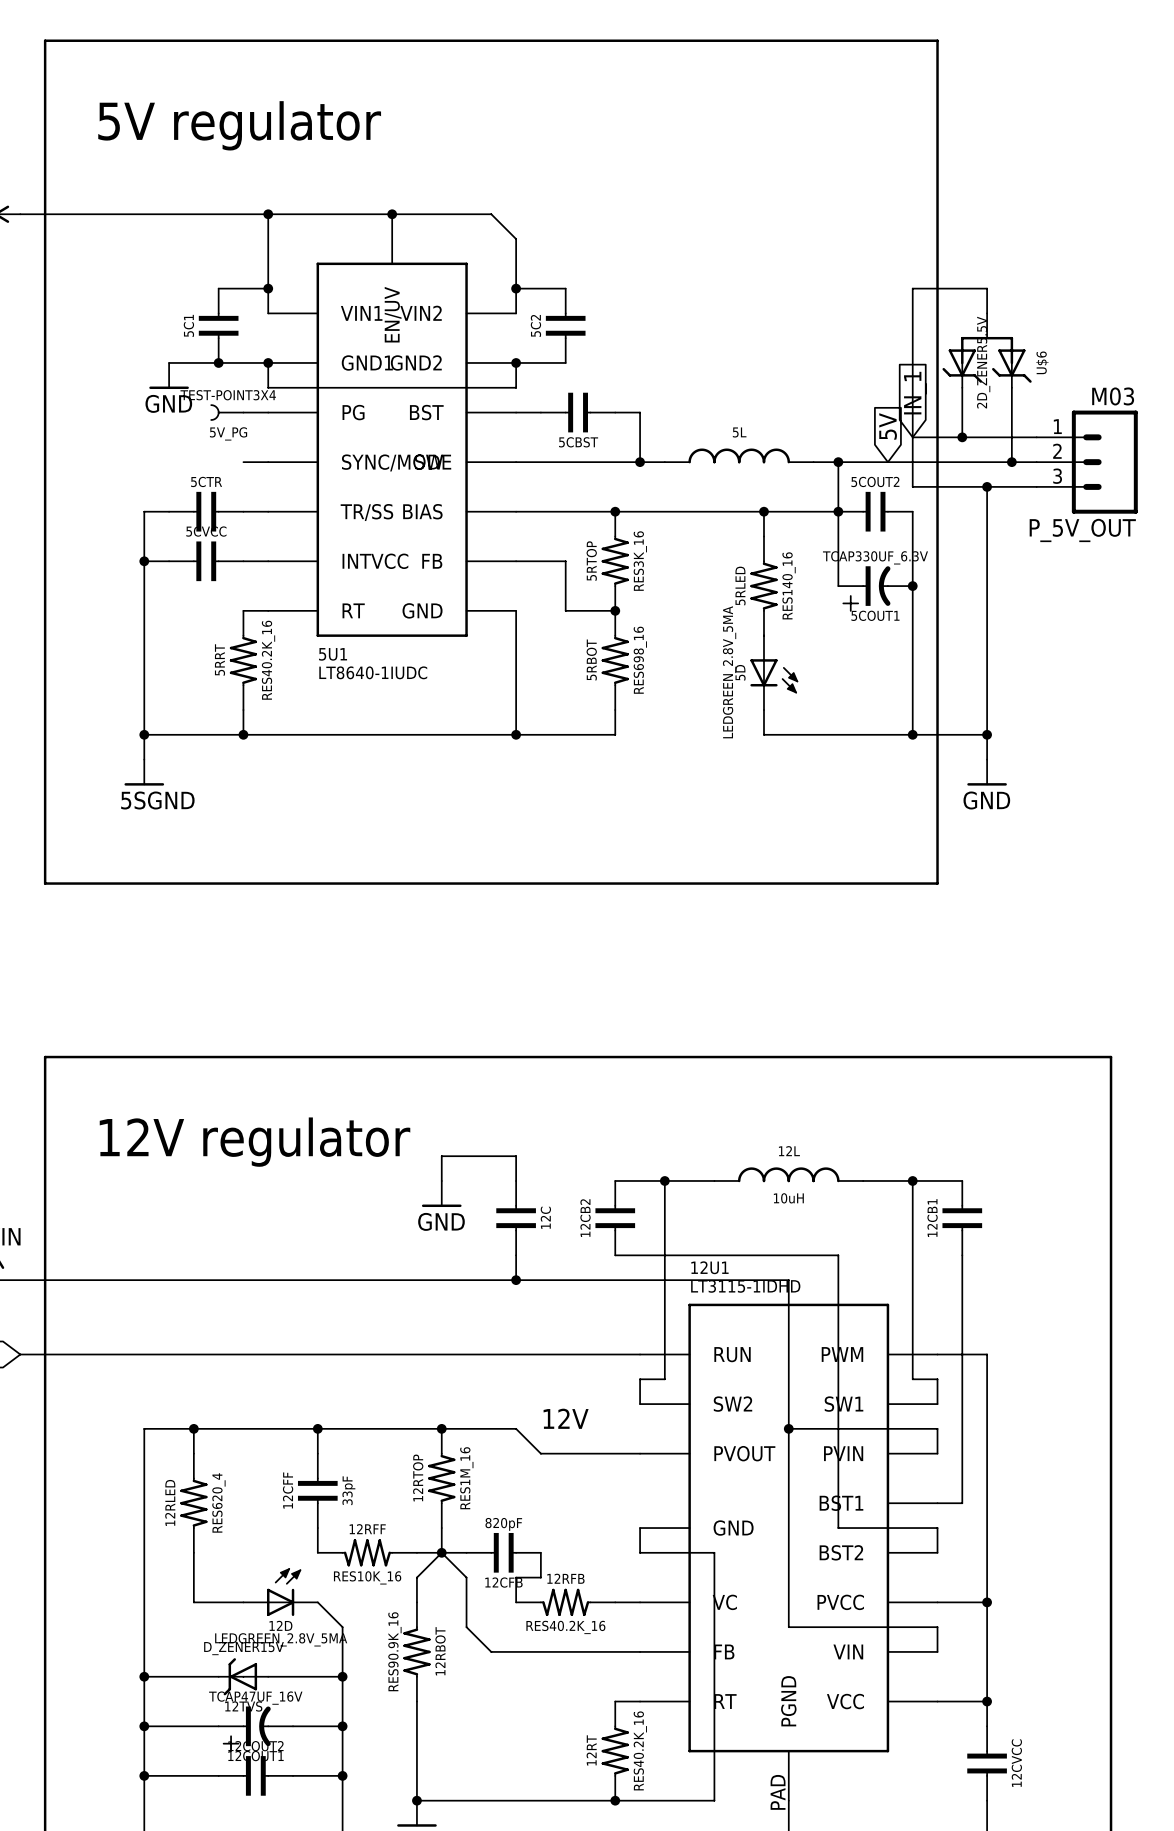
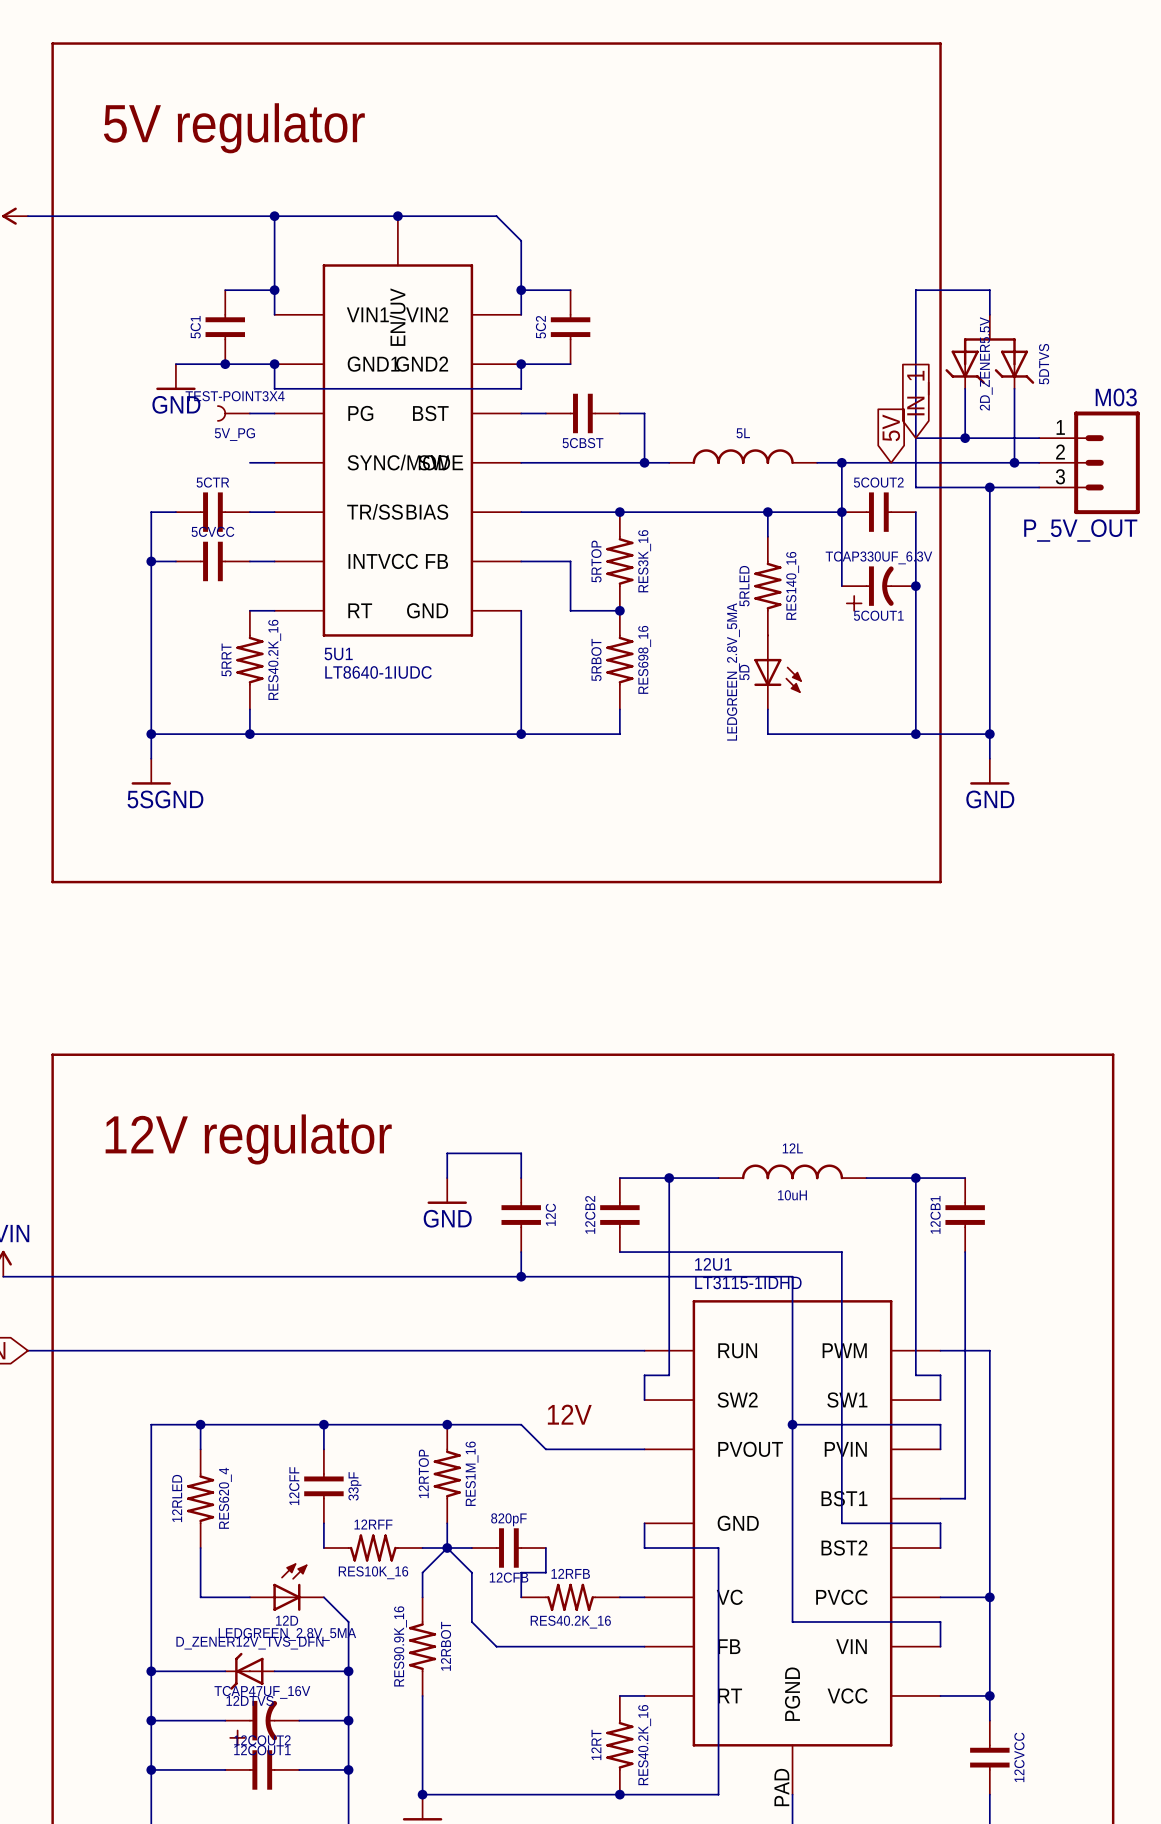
U$6 name: U$6 (1042, 362) -> 5DTVS (1044, 364)
12TVS value: D_ZENER15V (243, 1648) -> D_ZENER12V_TVS_DFN (249, 1643)
12TVS name: 12TVS (243, 1706) -> 12DTVS (250, 1700)

